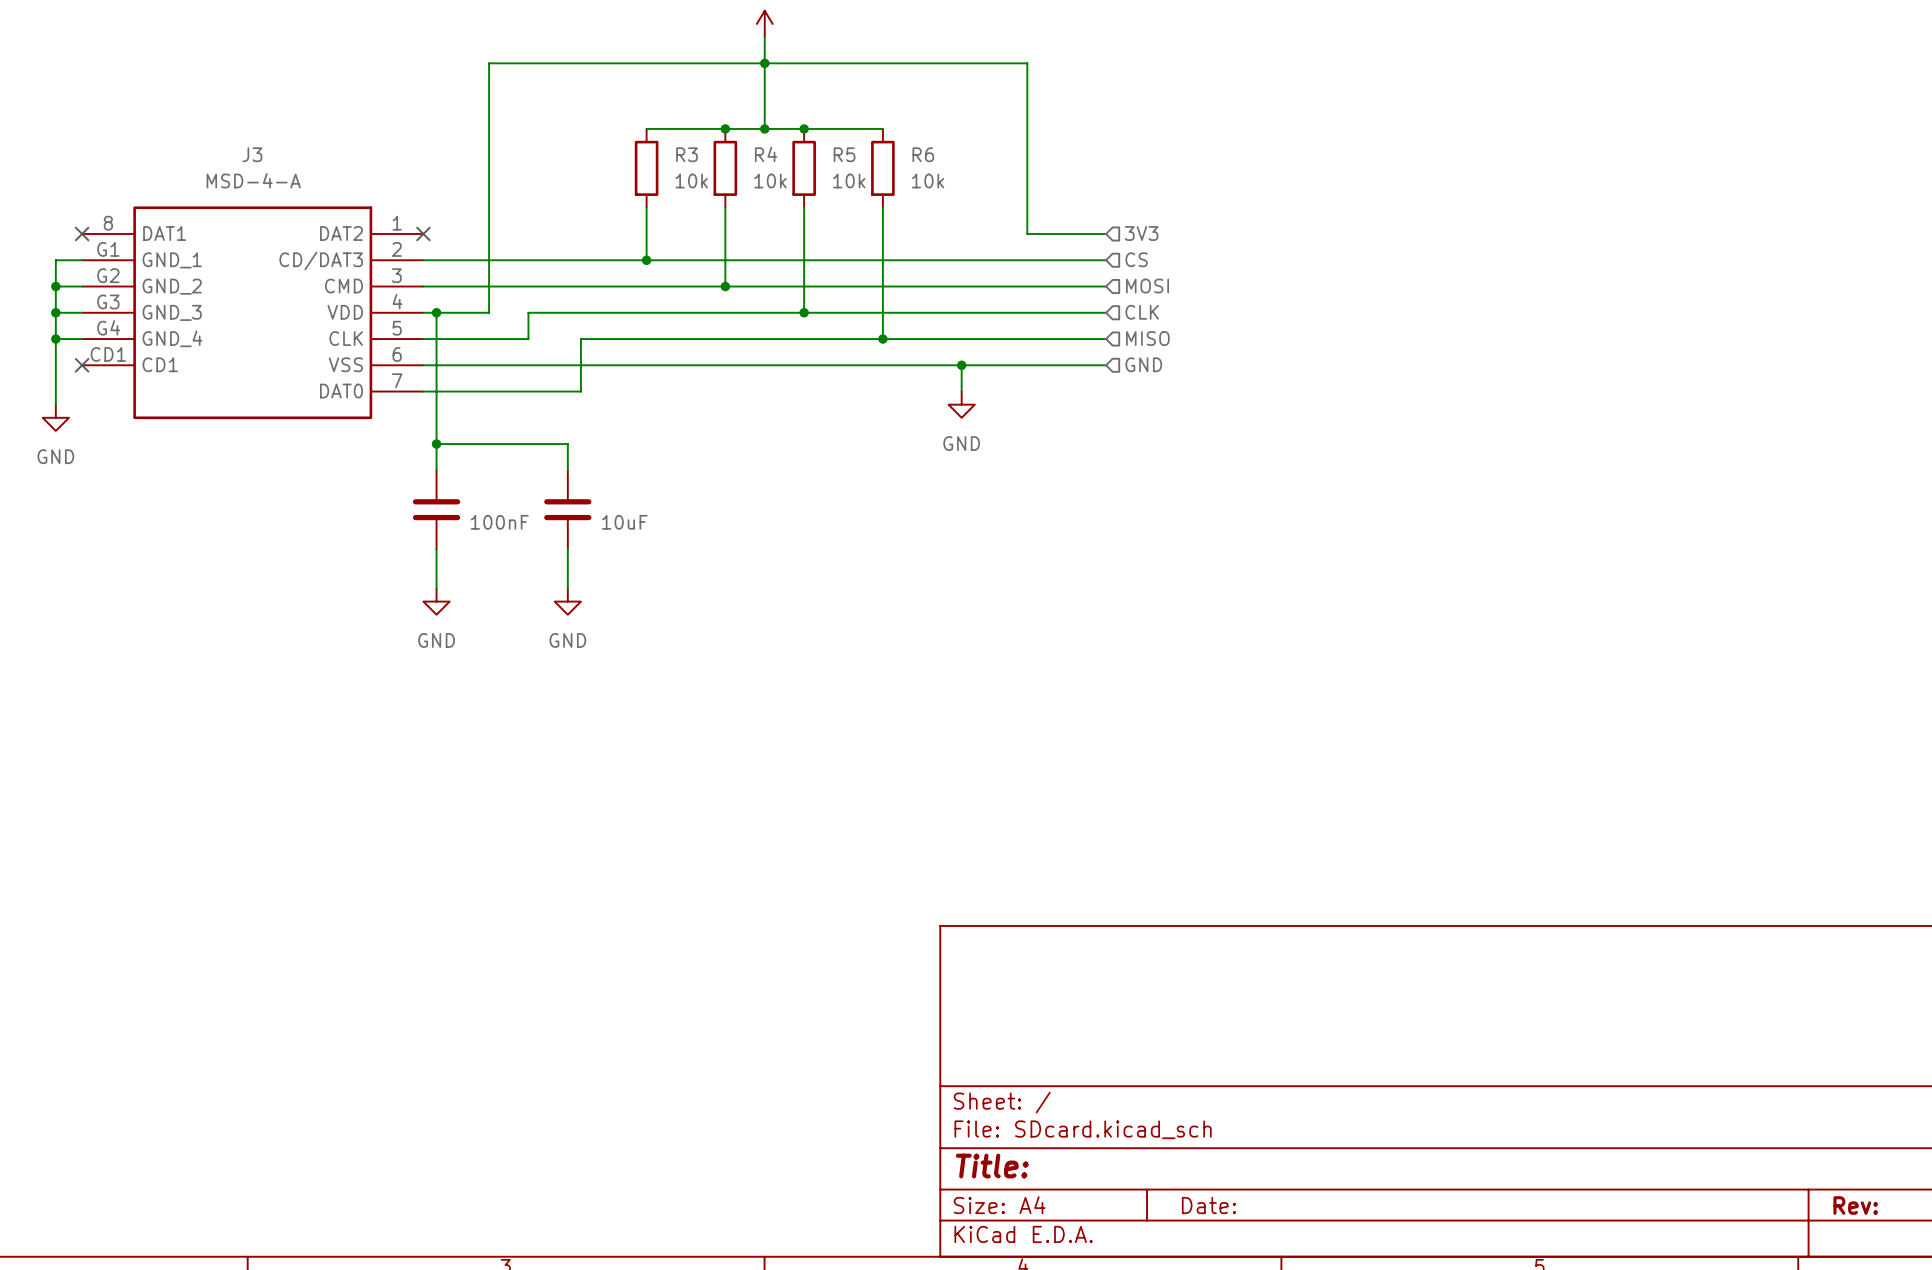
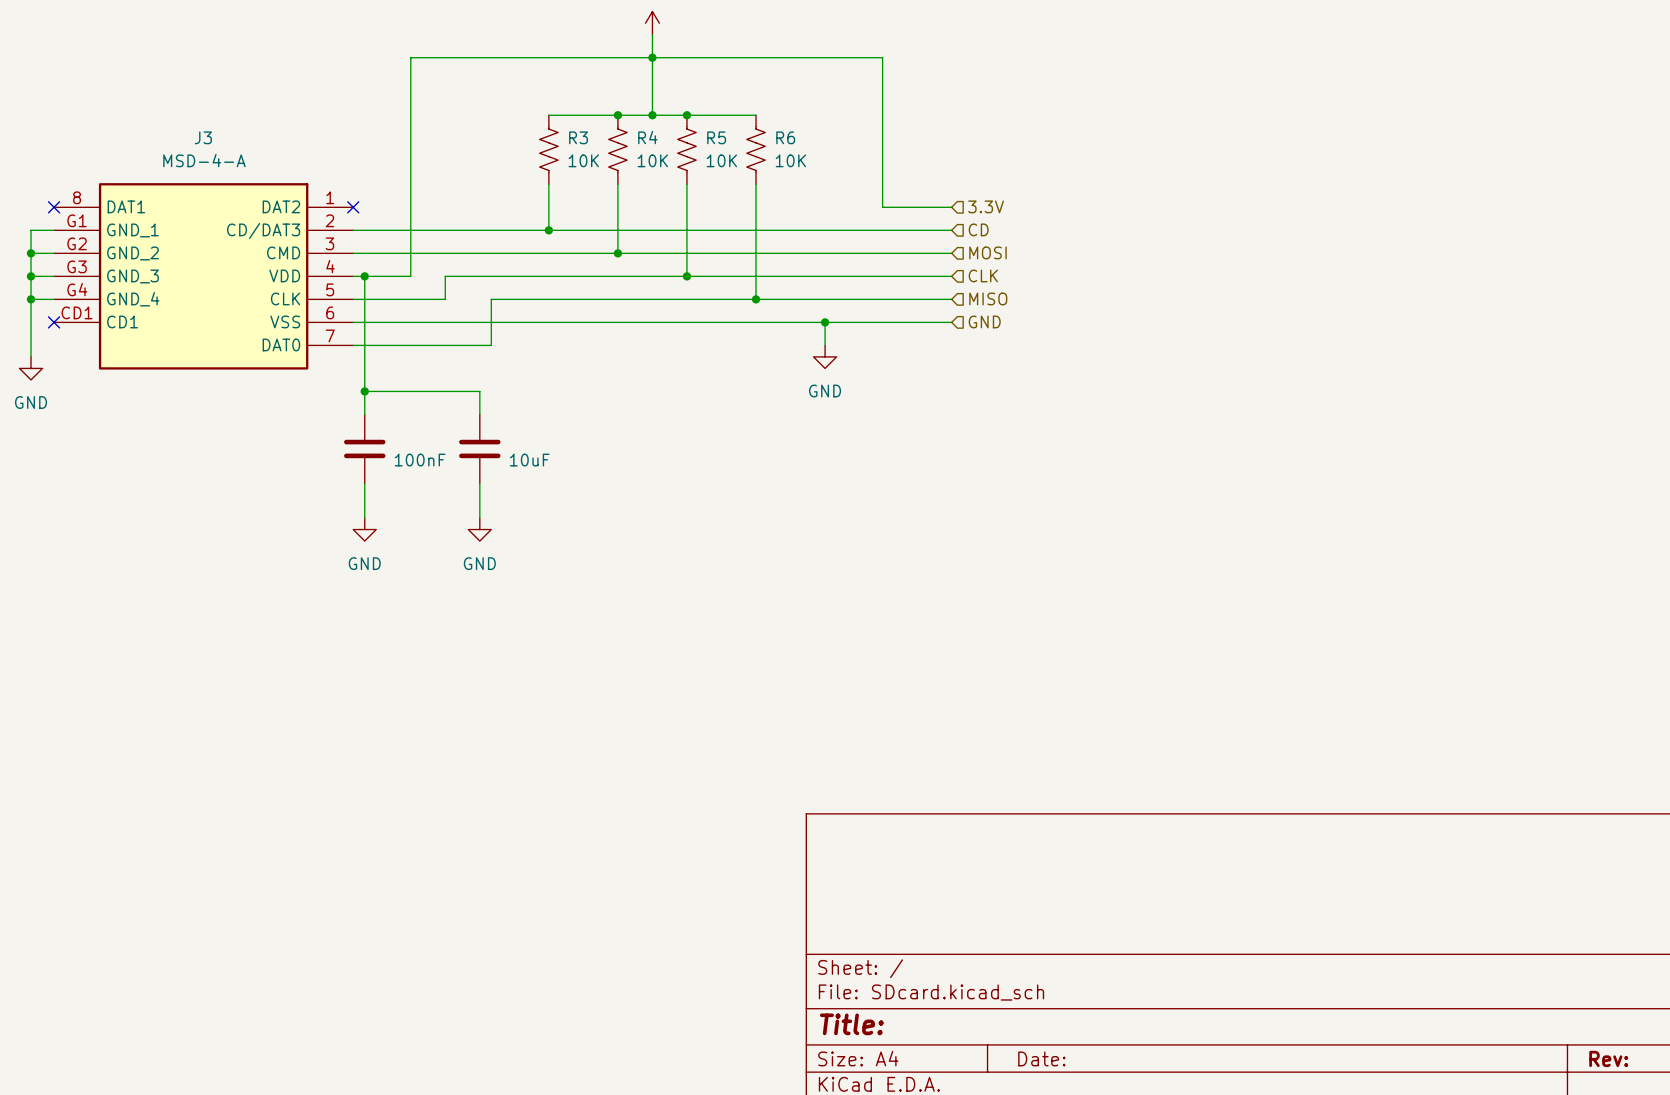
R3 symbol: [634, 128, 659, 208] -> [539, 115, 559, 185]
R4 symbol: [713, 128, 738, 208] -> [608, 115, 628, 185]
R5 symbol: [792, 128, 816, 208] -> [677, 115, 697, 185]
R6 symbol: [871, 128, 895, 208] -> [746, 115, 766, 185]
R3 value: 10k (691, 181) -> 10K (583, 160)
R4 value: 10k (770, 181) -> 10K (652, 160)
R5 value: 10k (849, 181) -> 10K (721, 160)
R6 value: 10k (928, 181) -> 10K (790, 160)
hierarchical label: 3V3 (1141, 233) -> 3.3V (986, 206)
hierarchical label: CS (1136, 259) -> CD (978, 229)

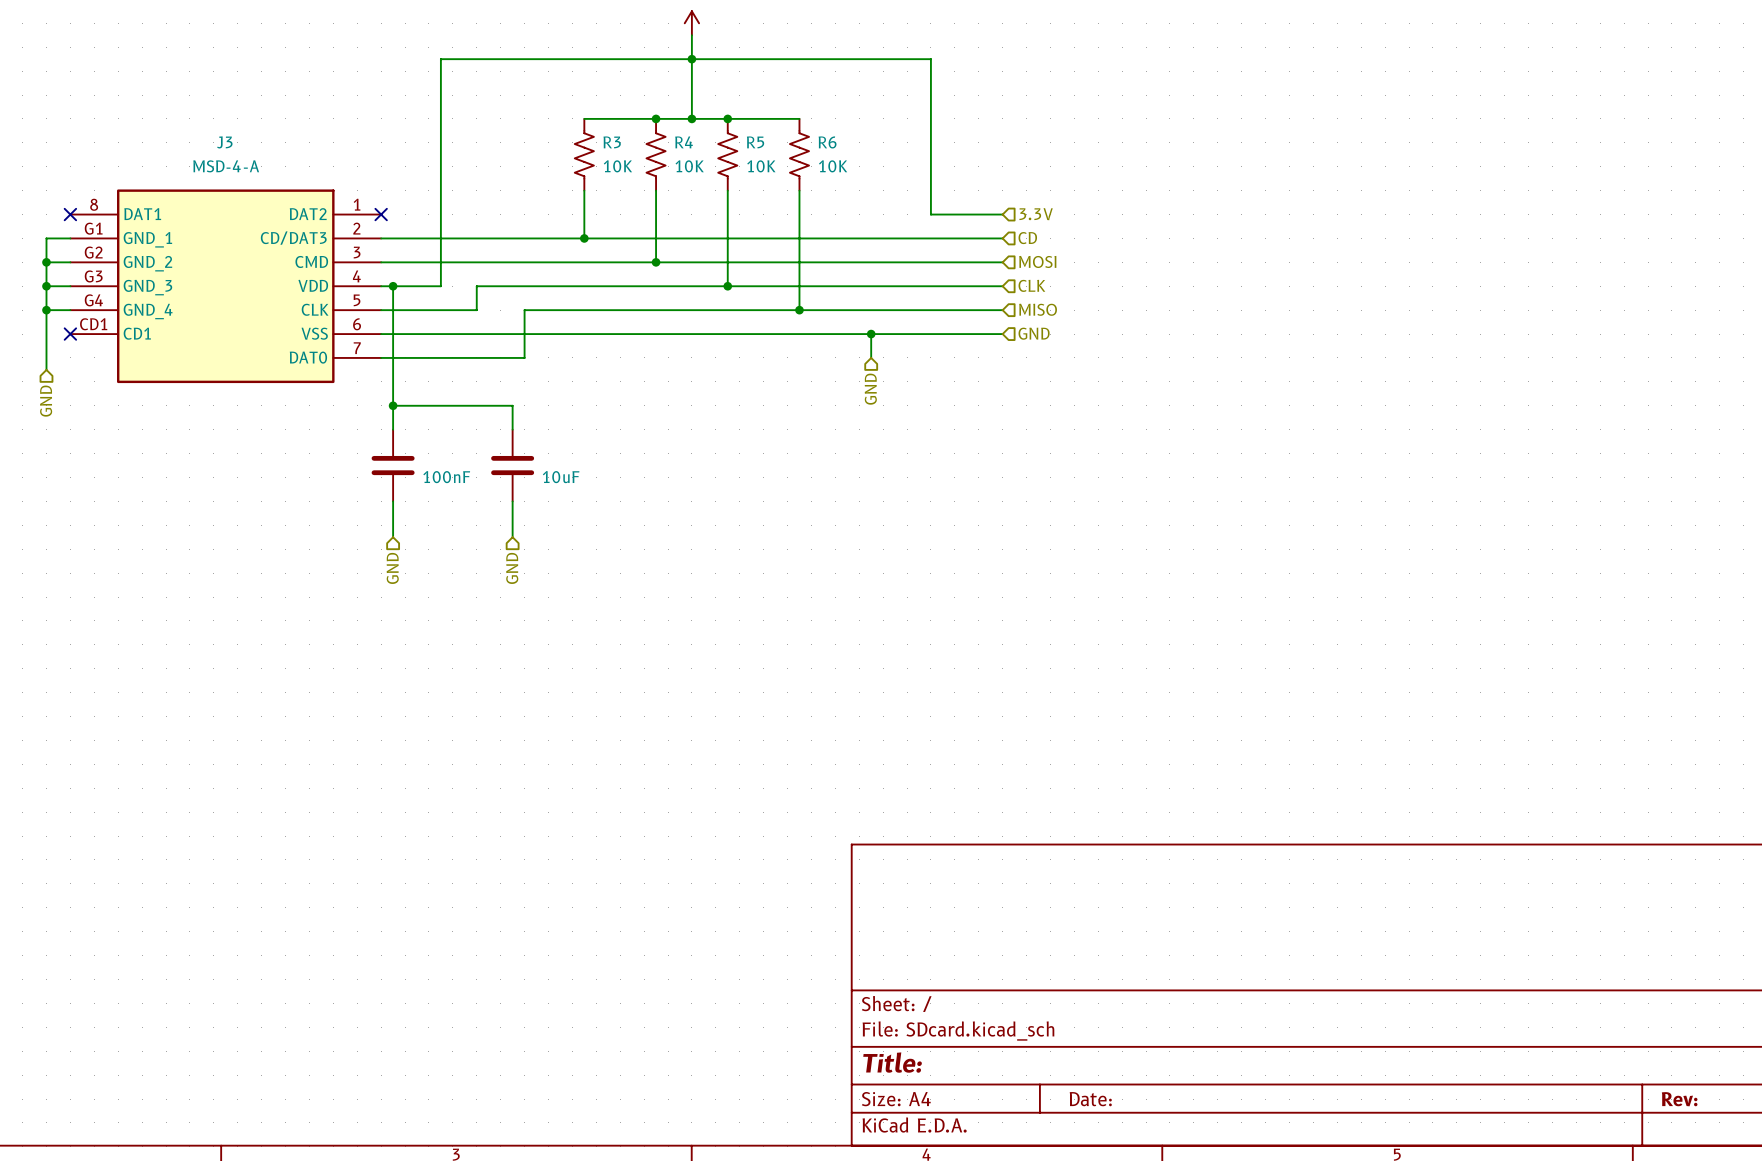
power symbol: GND (825, 356) -> none
power symbol: GND (31, 368) -> none
hierarchical label: none -> GND (870, 389)
hierarchical label: none -> GND (46, 401)
power symbol: GND (364, 529) -> none
power symbol: GND (479, 529) -> none
hierarchical label: none -> GND (392, 568)
hierarchical label: none -> GND (512, 568)

